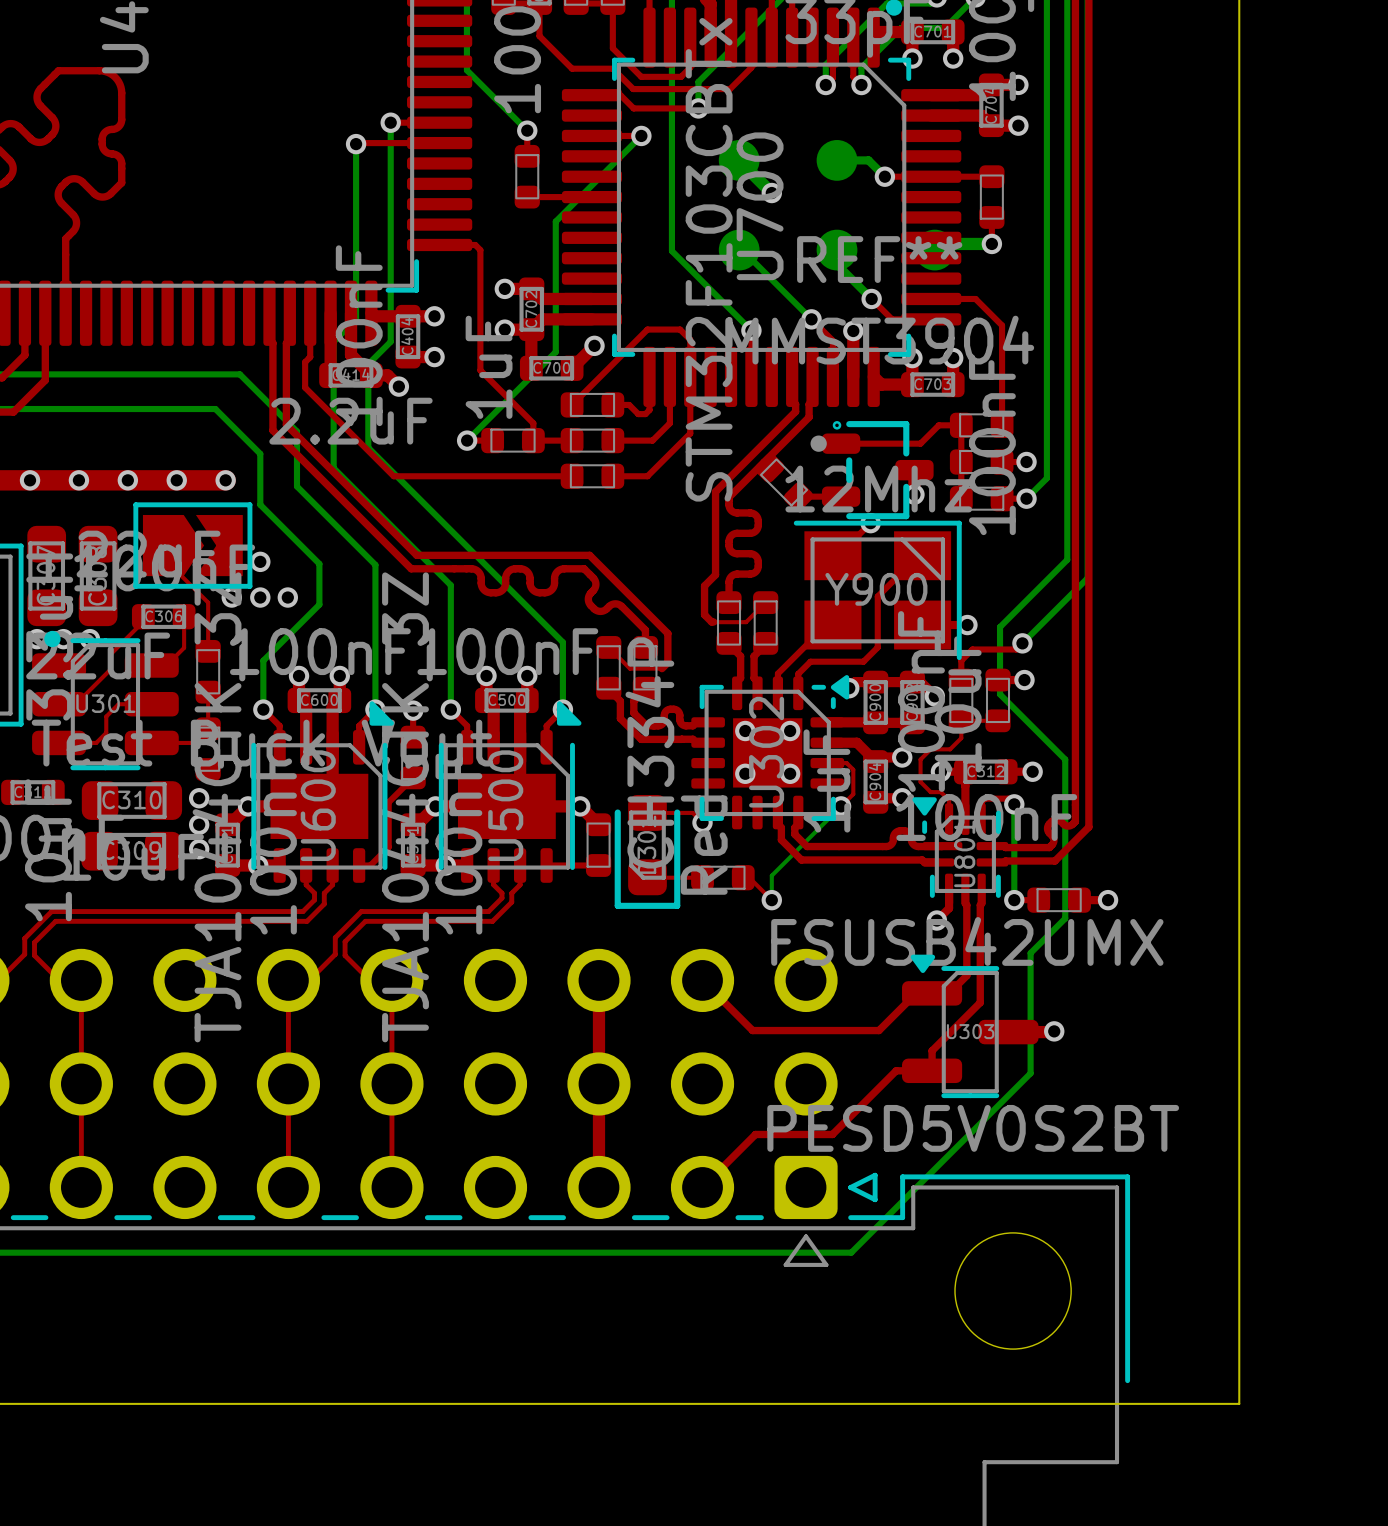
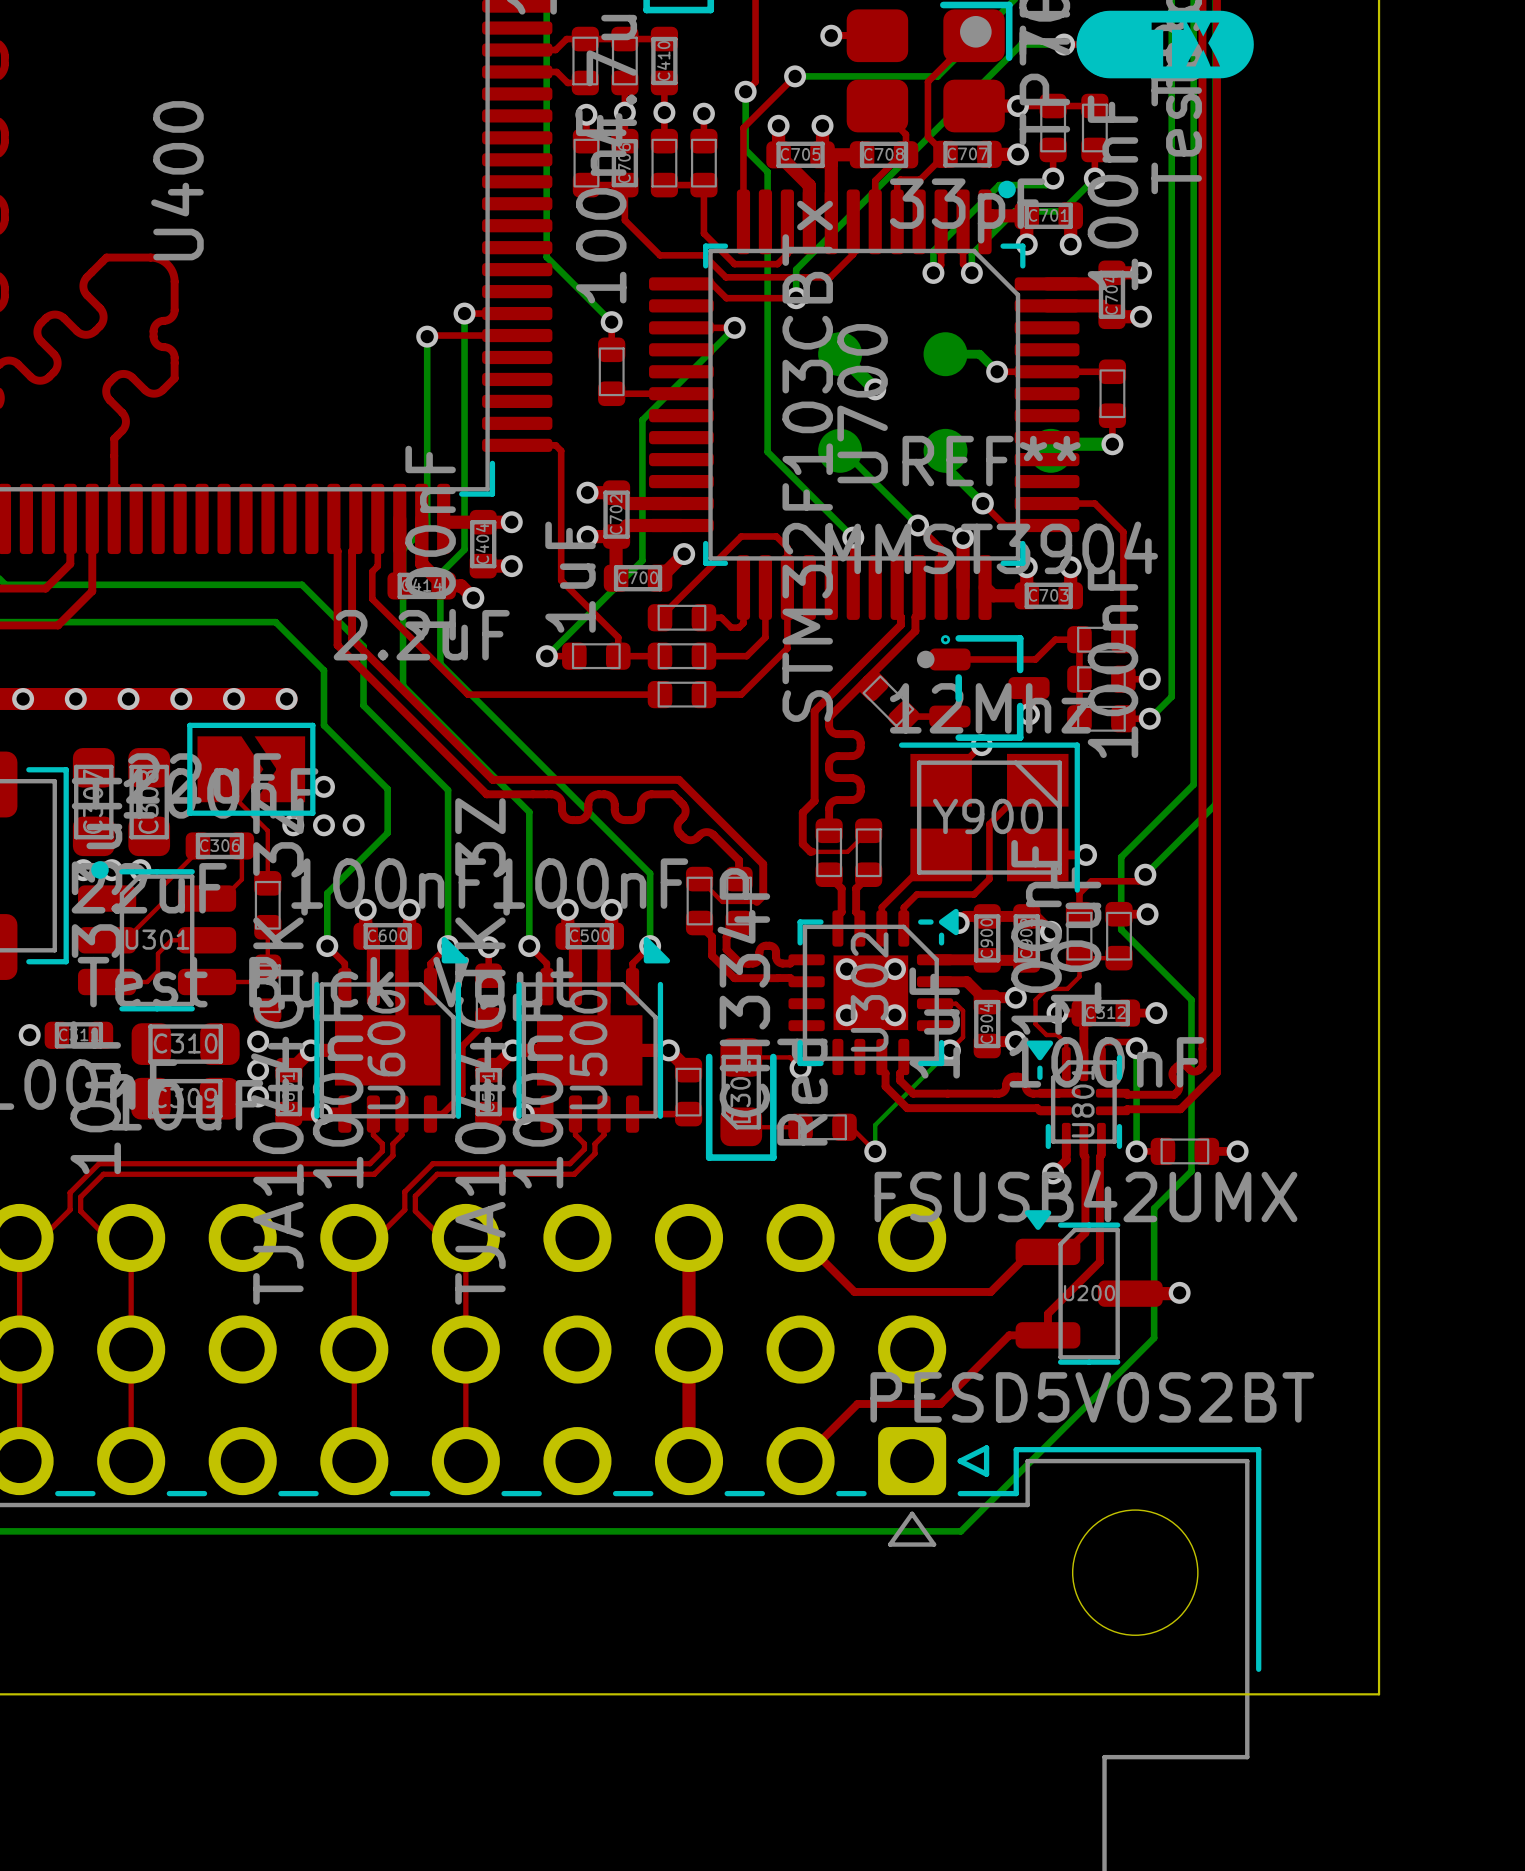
U303 name: U303 (970, 1031) -> U200 (1089, 1293)

